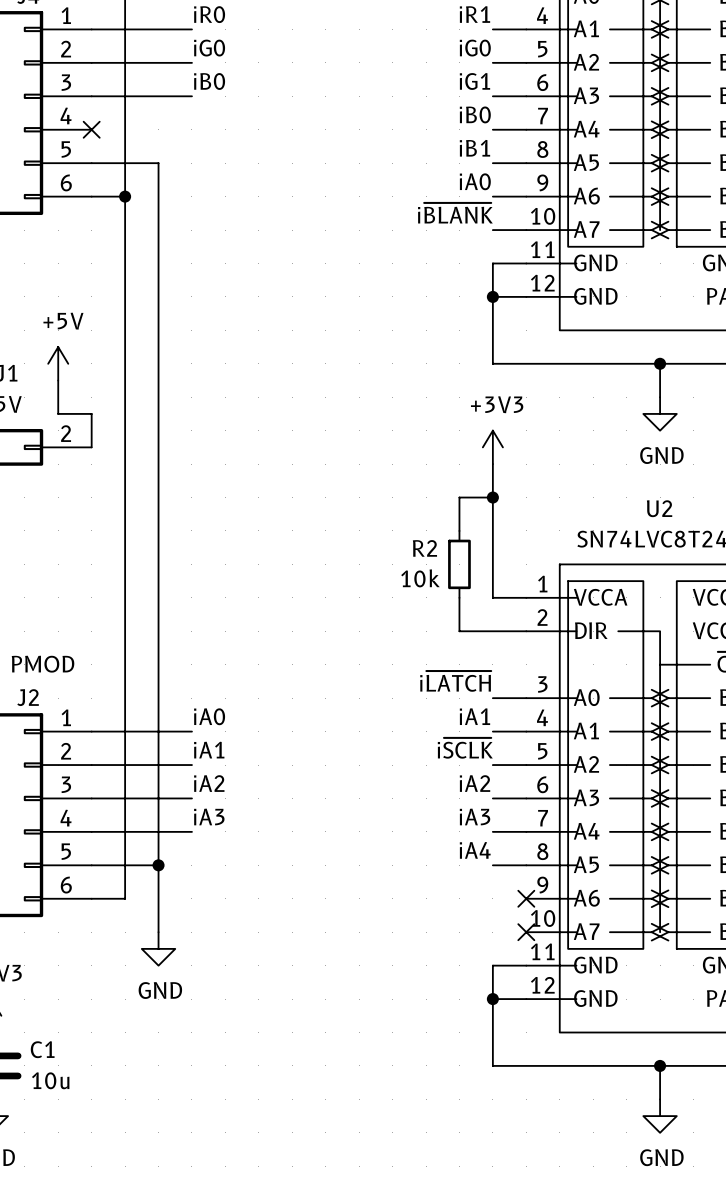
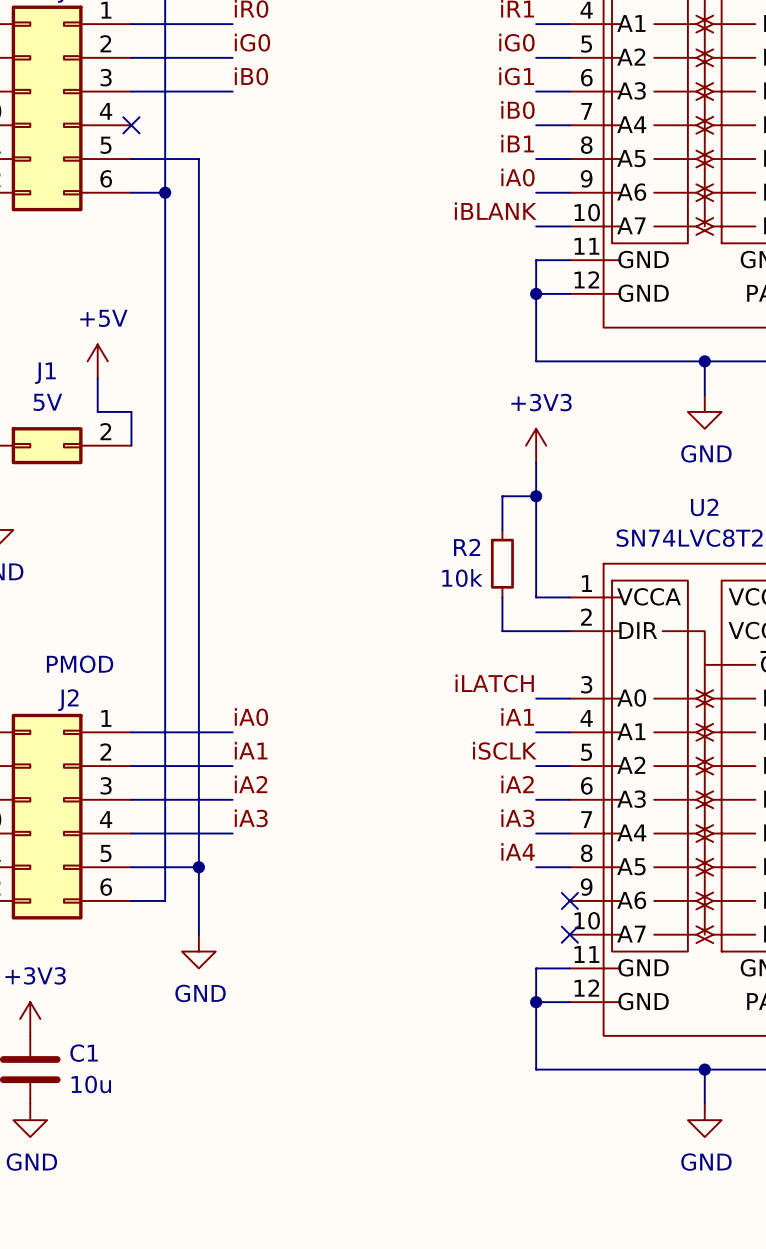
label: i~{BLANK} (455, 213) -> iBLANK (495, 211)
label: i~{LATCH} (455, 681) -> iLATCH (494, 683)
label: i~{SCLK} (465, 748) -> iSCLK (504, 750)

